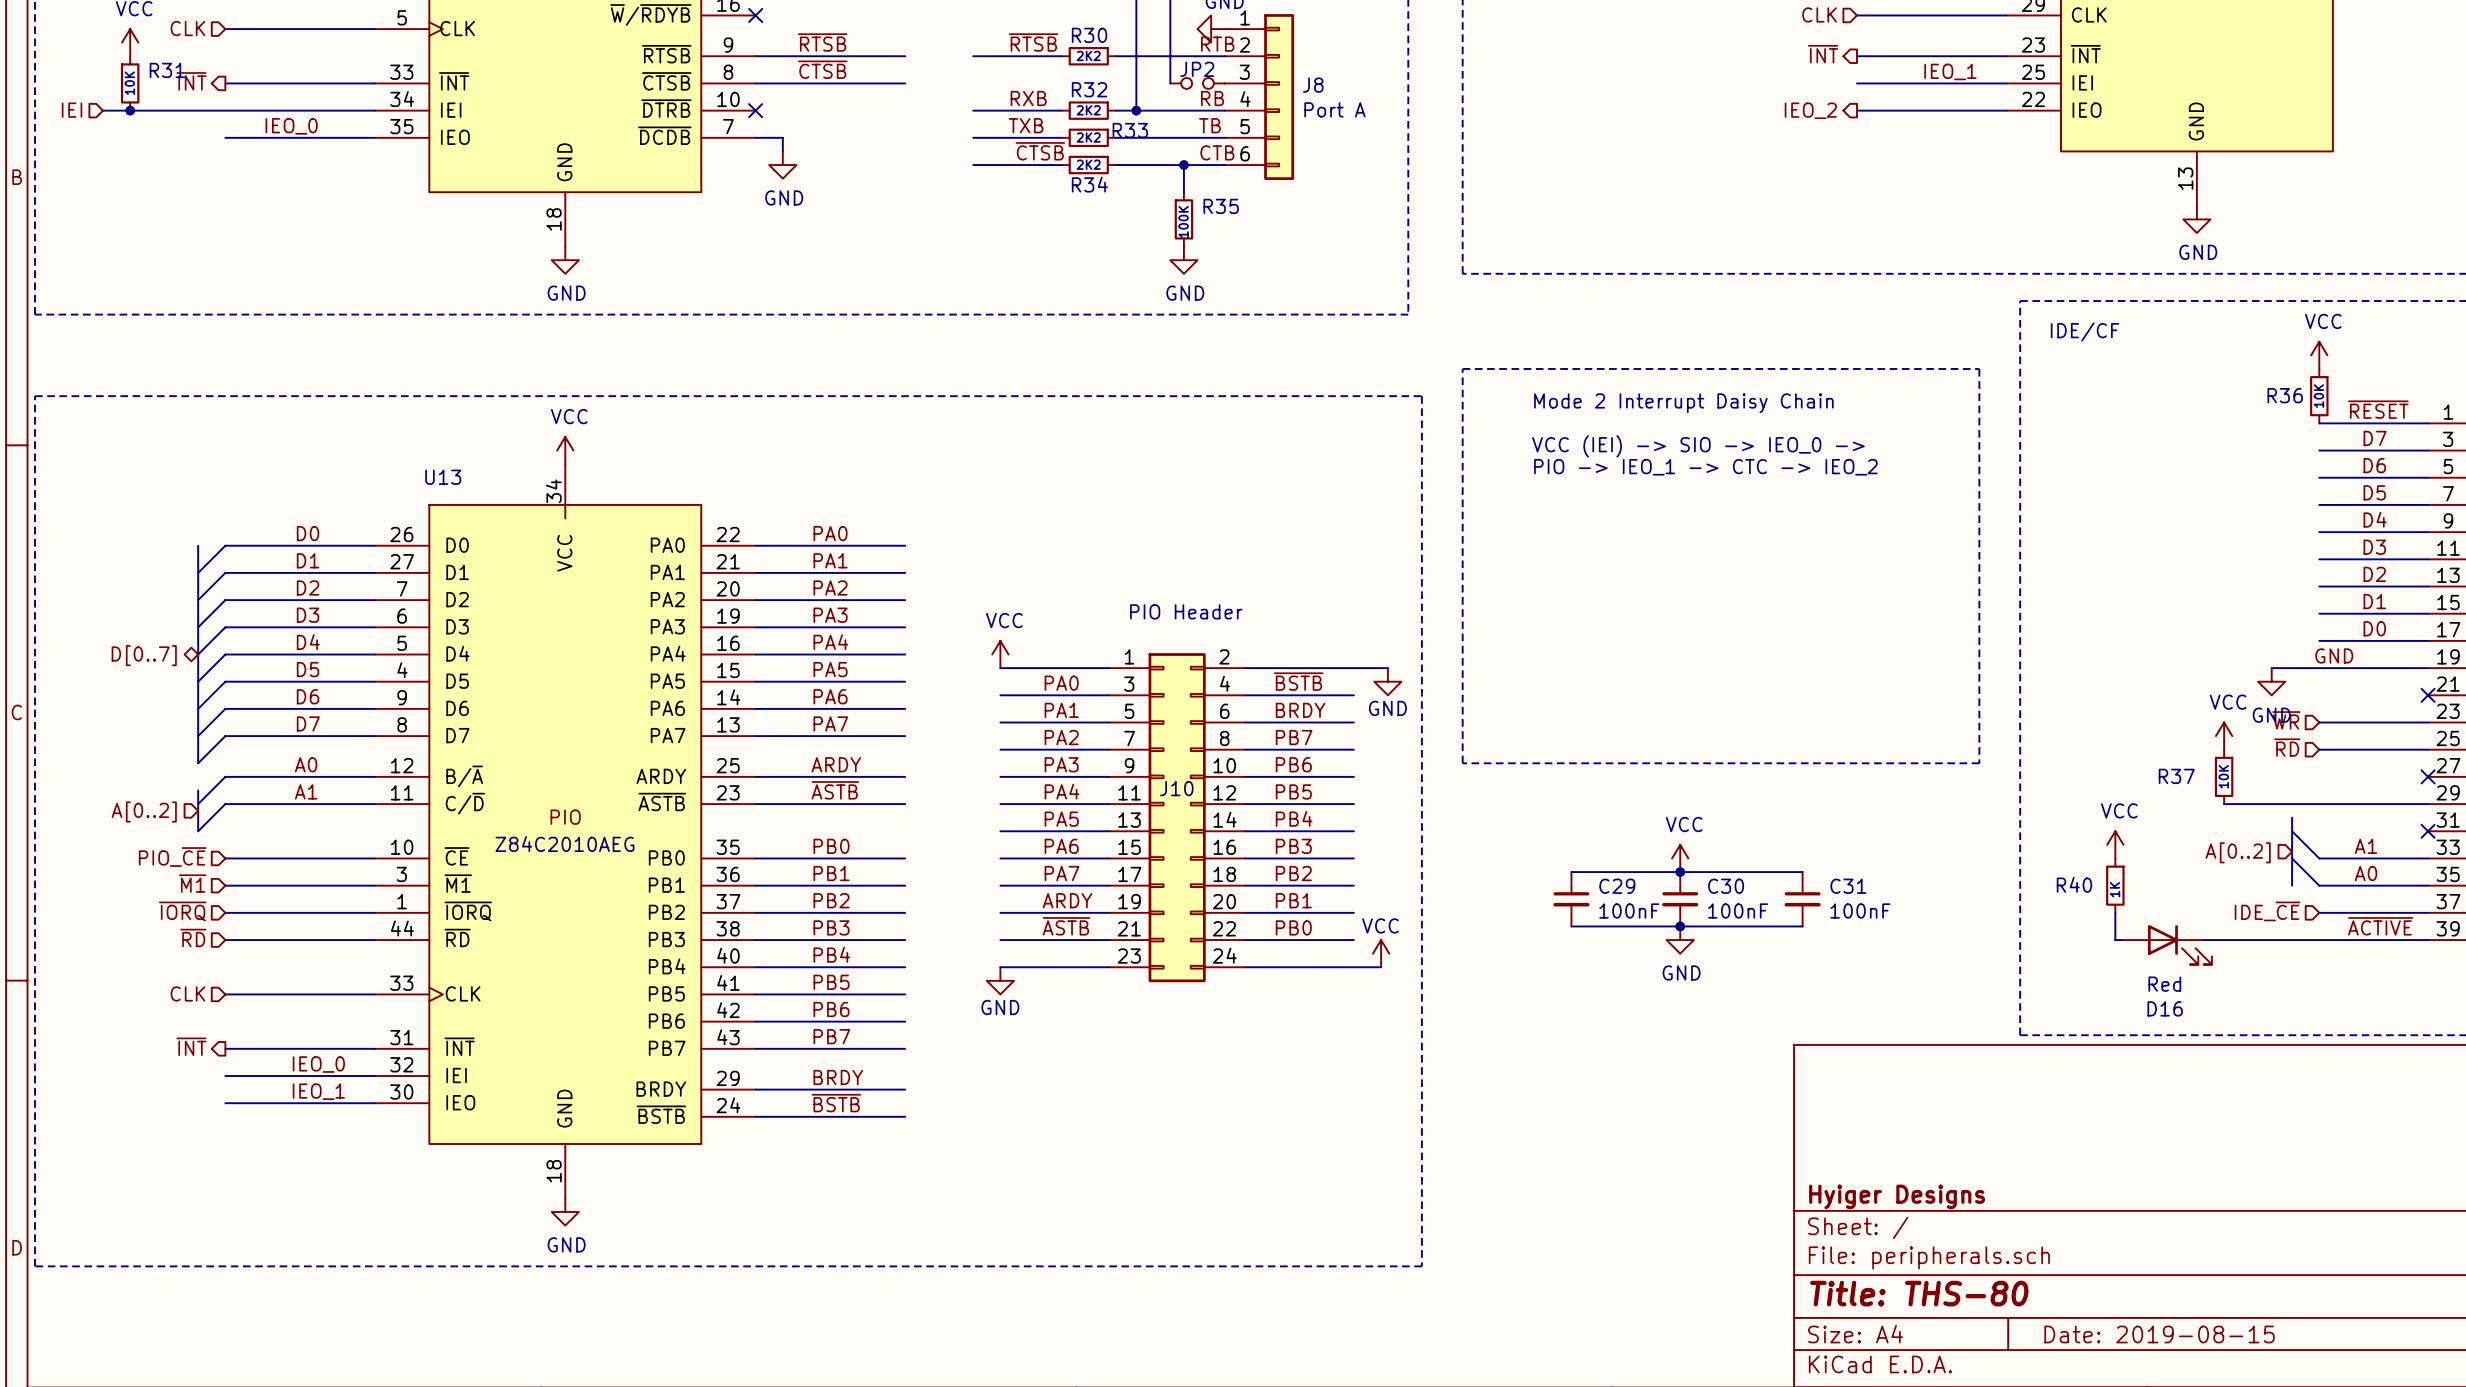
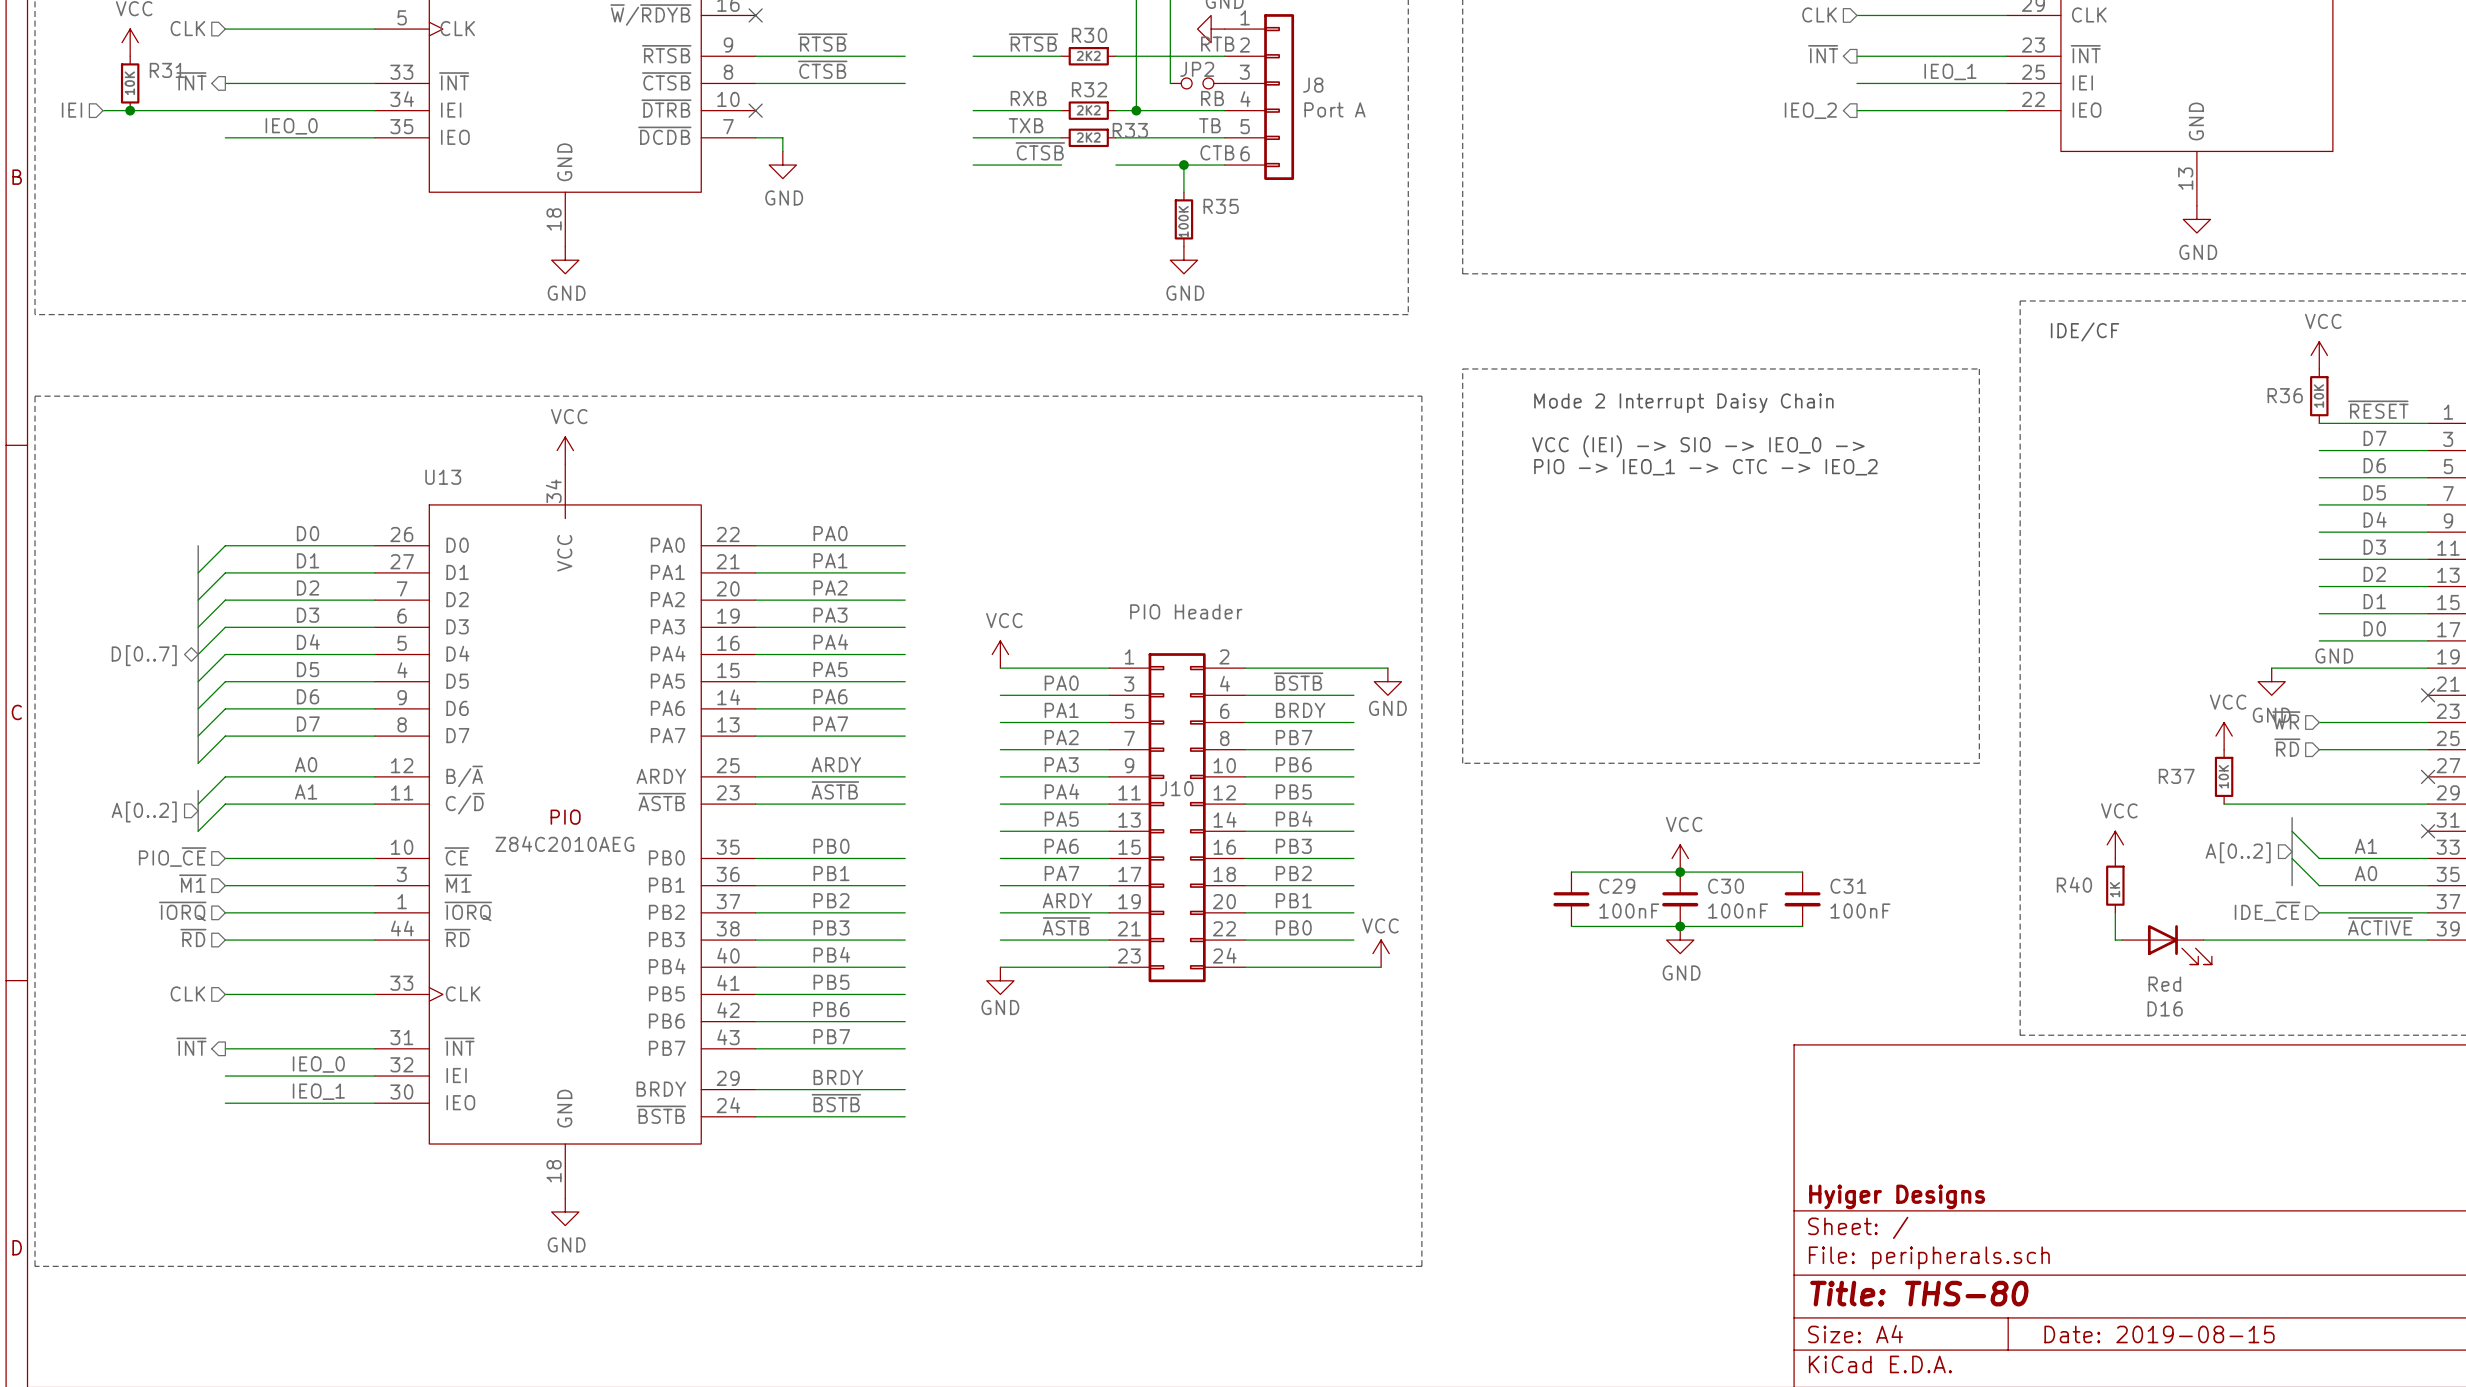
R34: 2K2 (1088, 165) -> none

